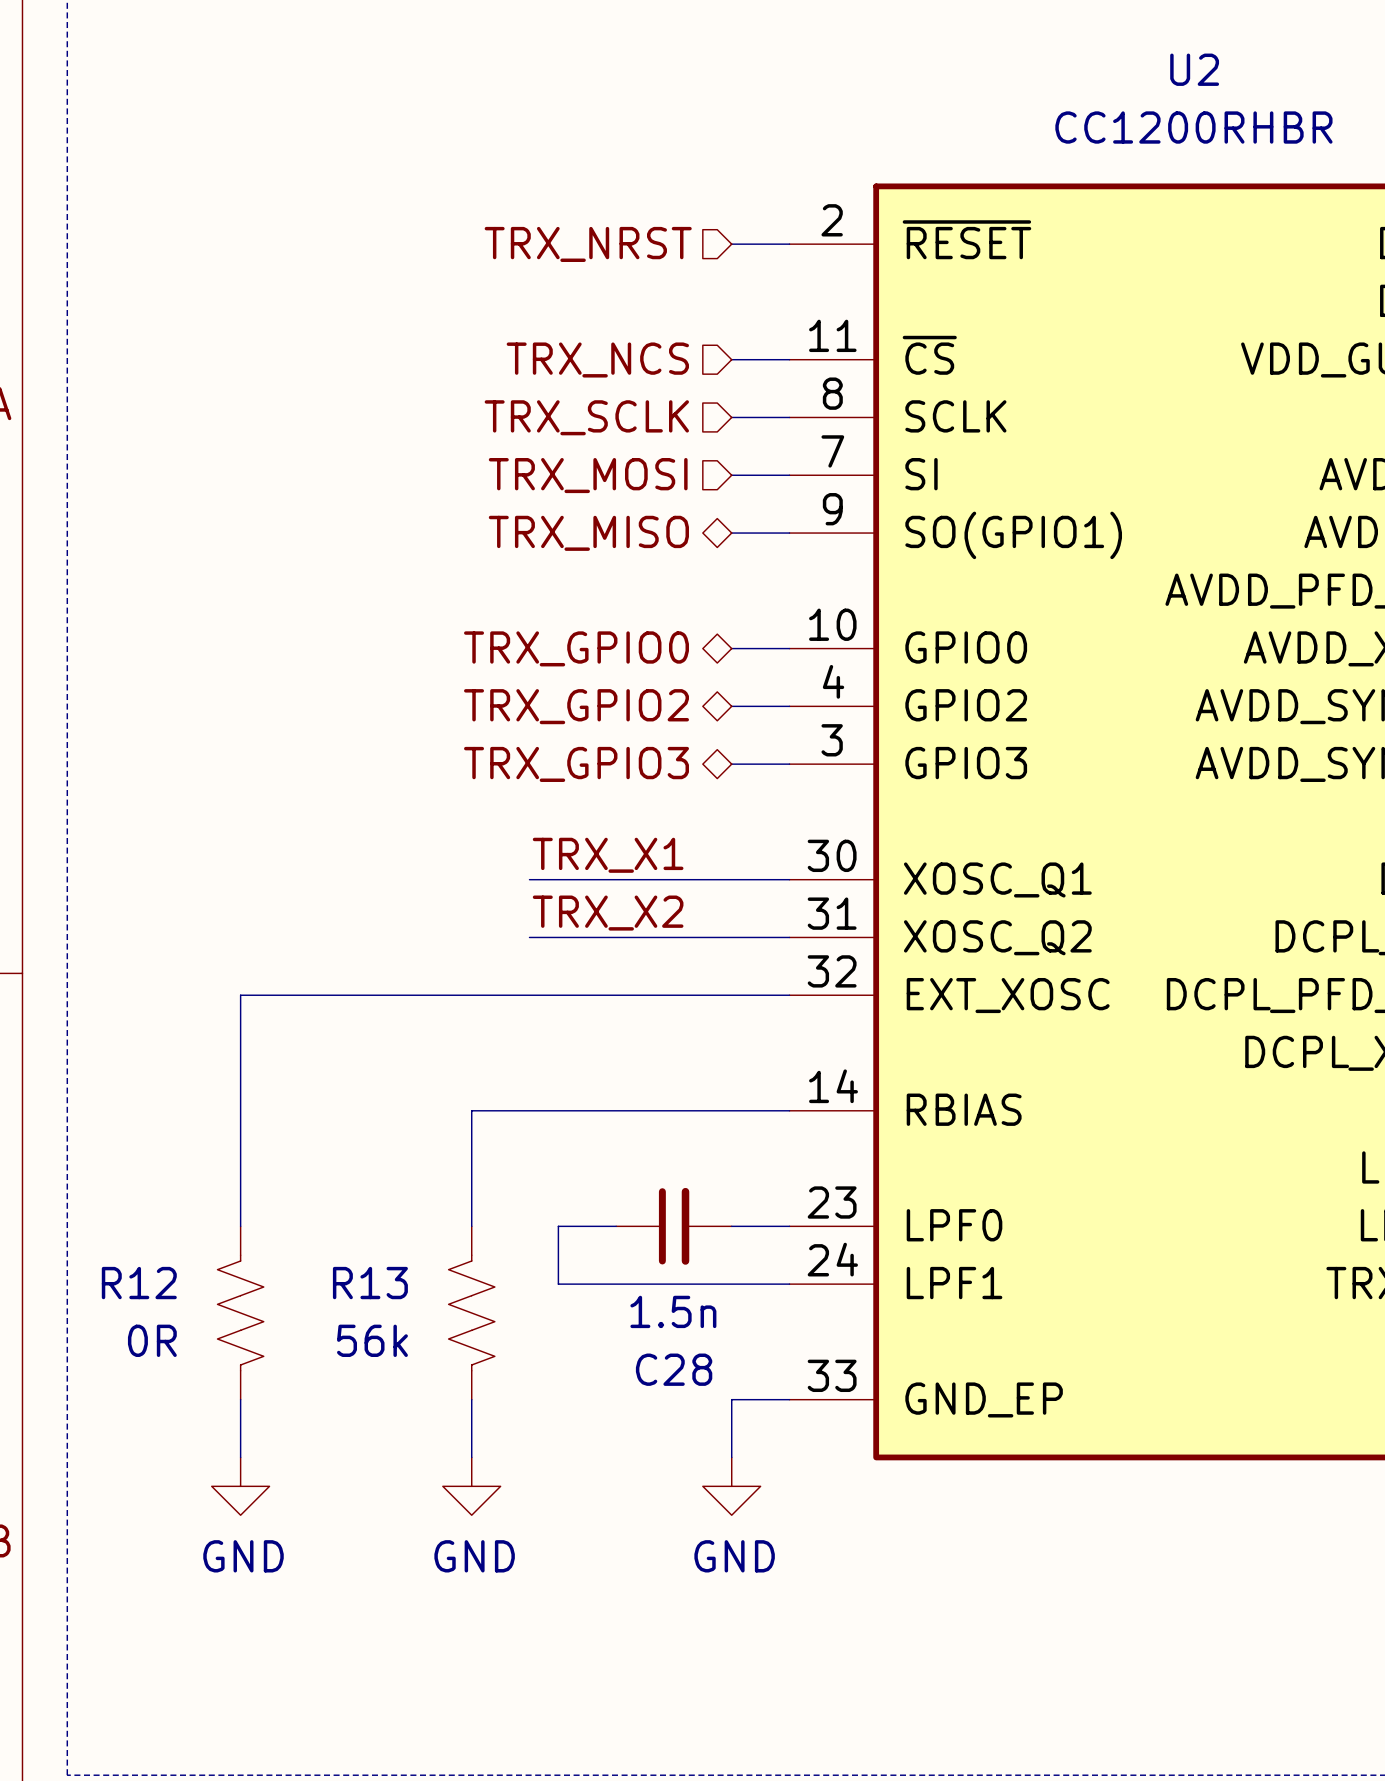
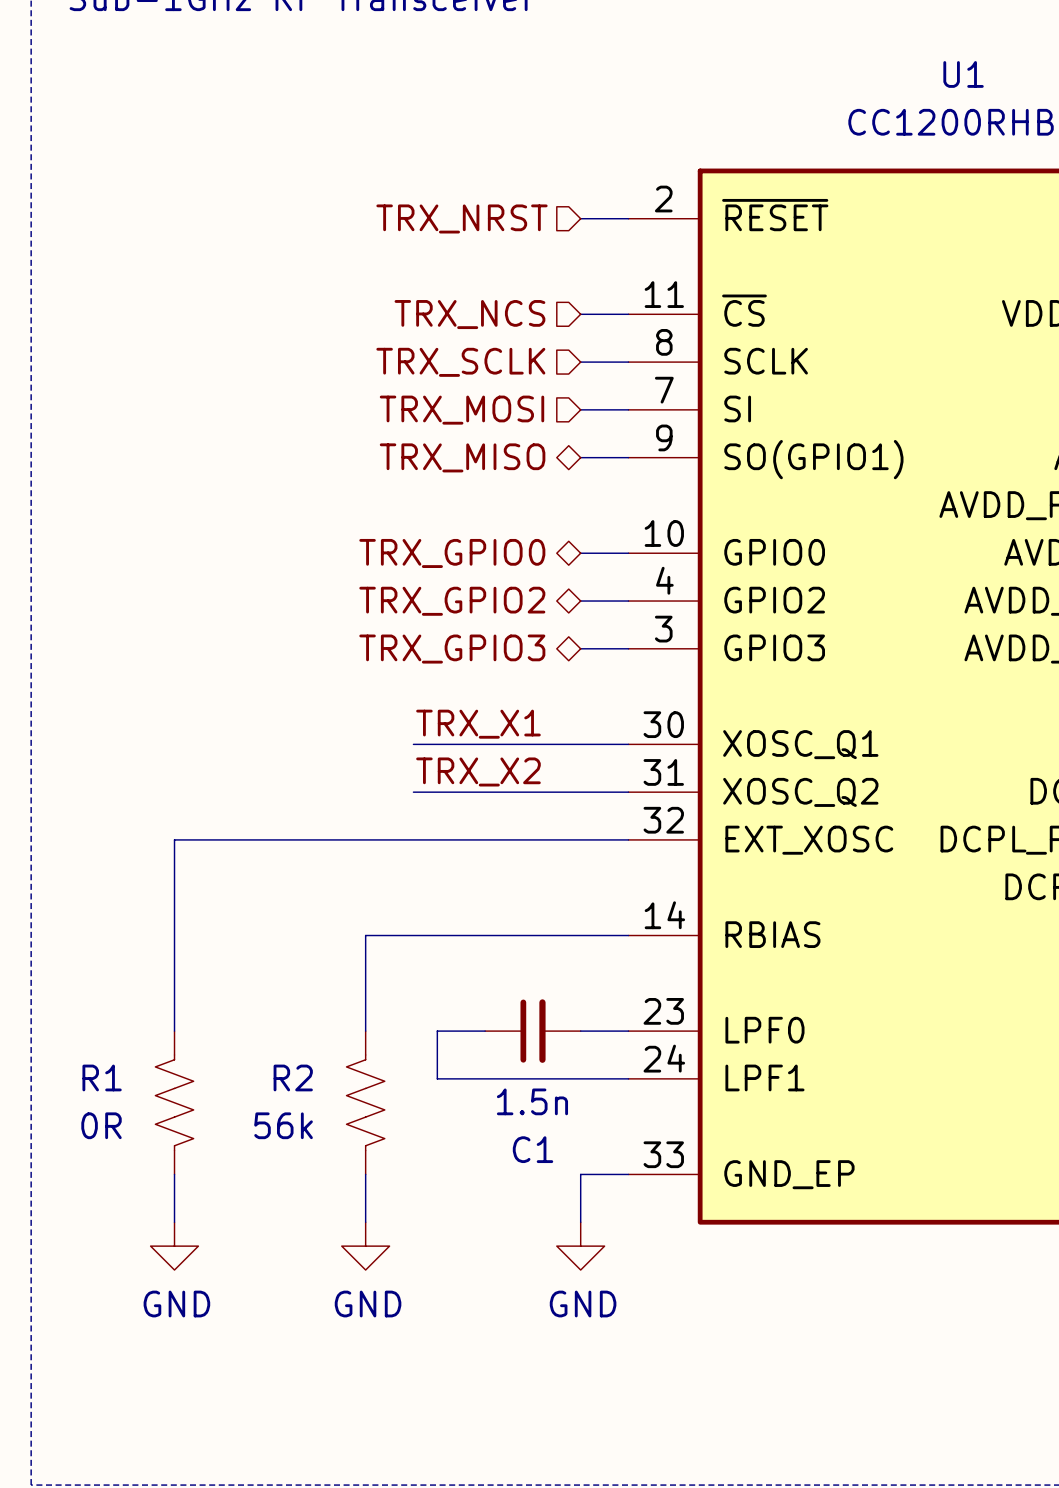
U2 name: U2 (1194, 69) -> U1 (963, 74)
R12 name: R12 (139, 1283) -> R1 (102, 1077)
R13 name: R13 (370, 1283) -> R2 (293, 1077)
C28 name: C28 (674, 1369) -> C1 (533, 1149)

